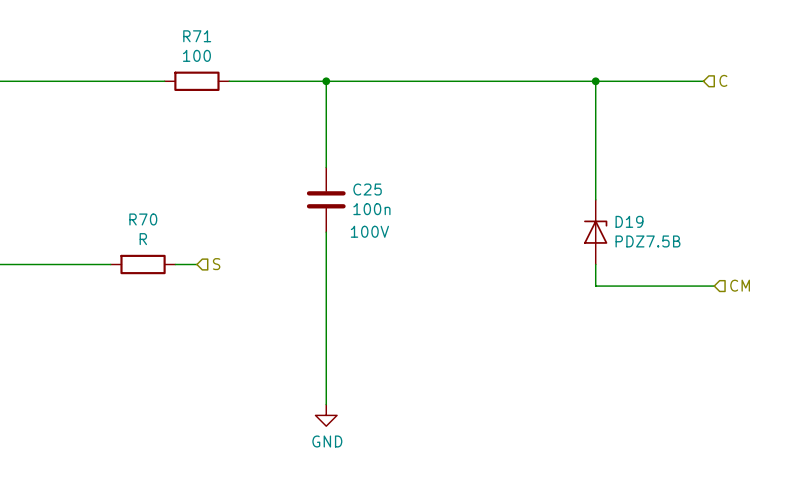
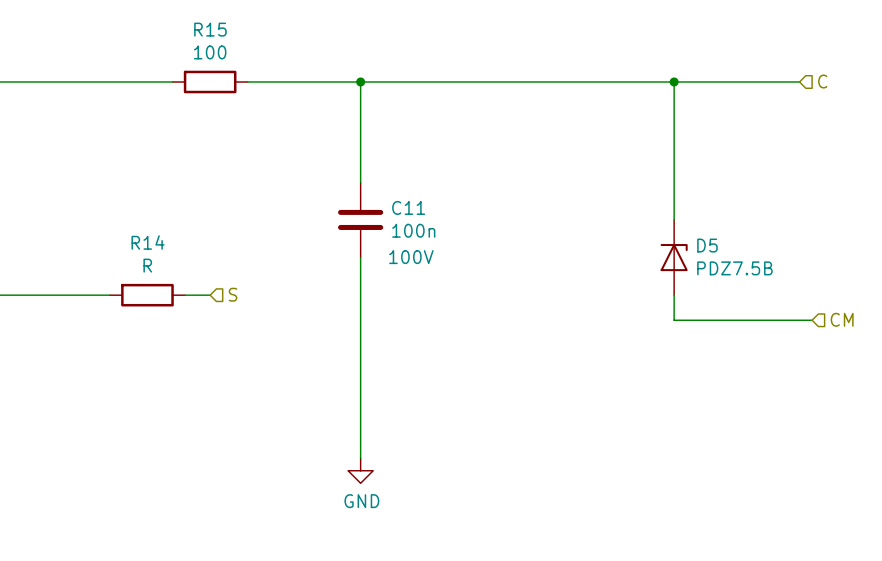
R71 name: R71 (197, 36) -> R15 (210, 29)
C25 name: C25 (367, 189) -> C11 (408, 207)
R70 name: R70 (143, 219) -> R14 (148, 242)
D19 name: D19 (629, 221) -> D5 (707, 245)

